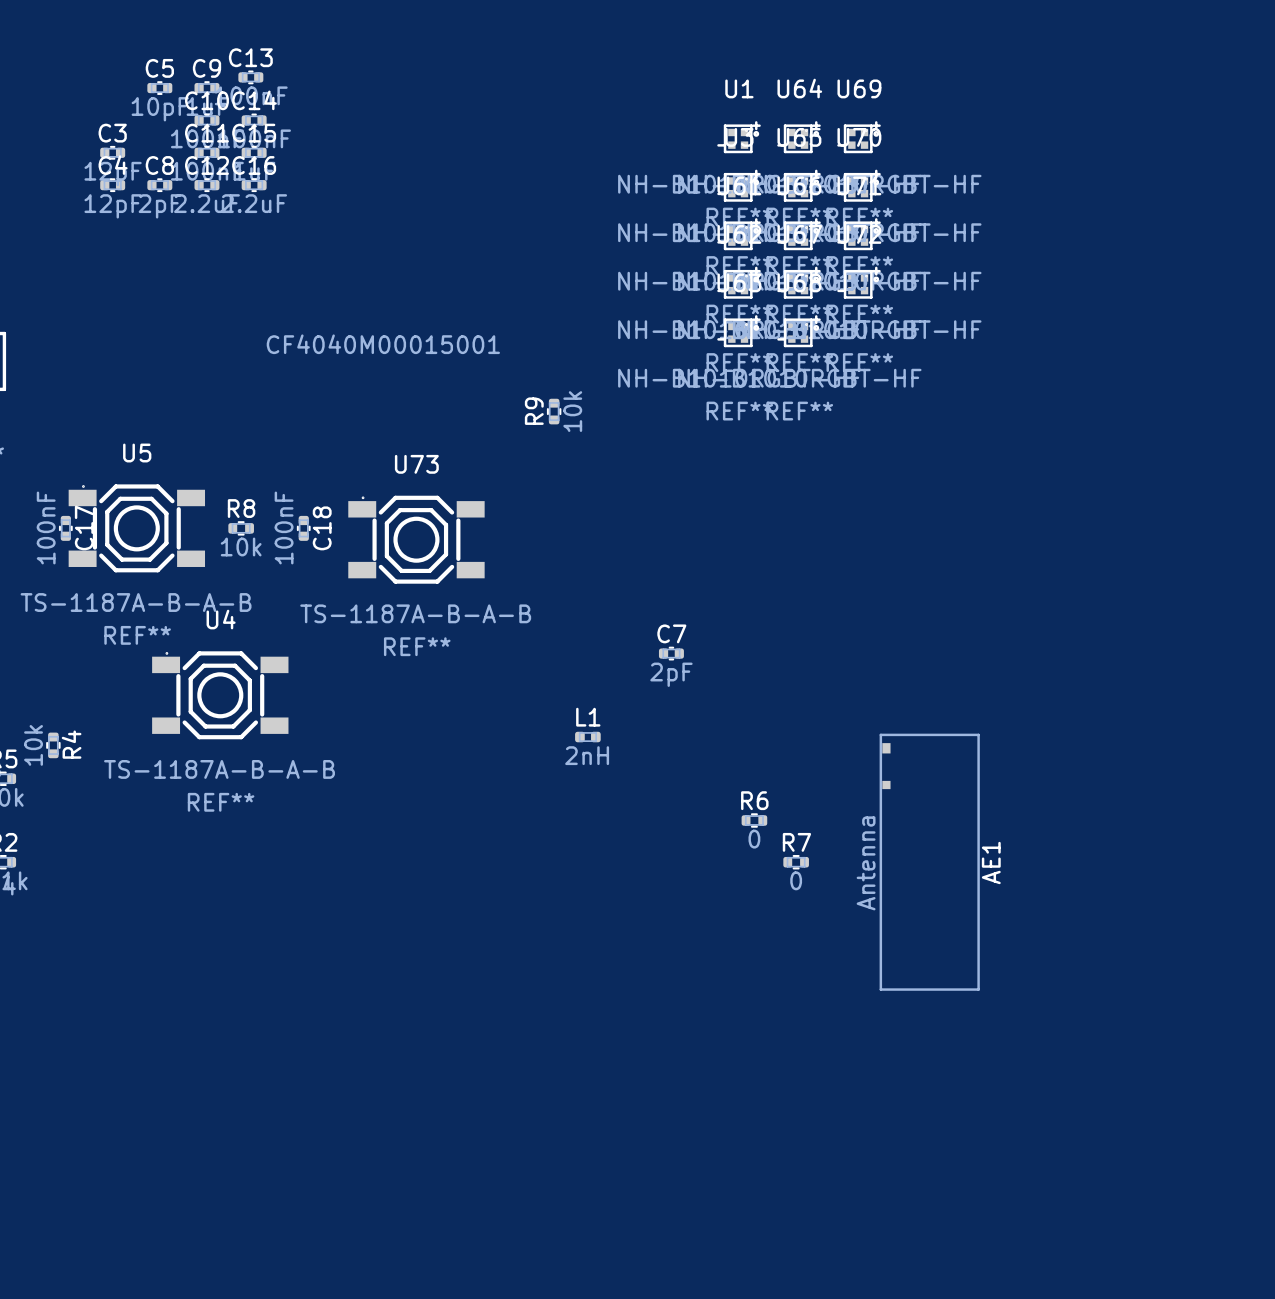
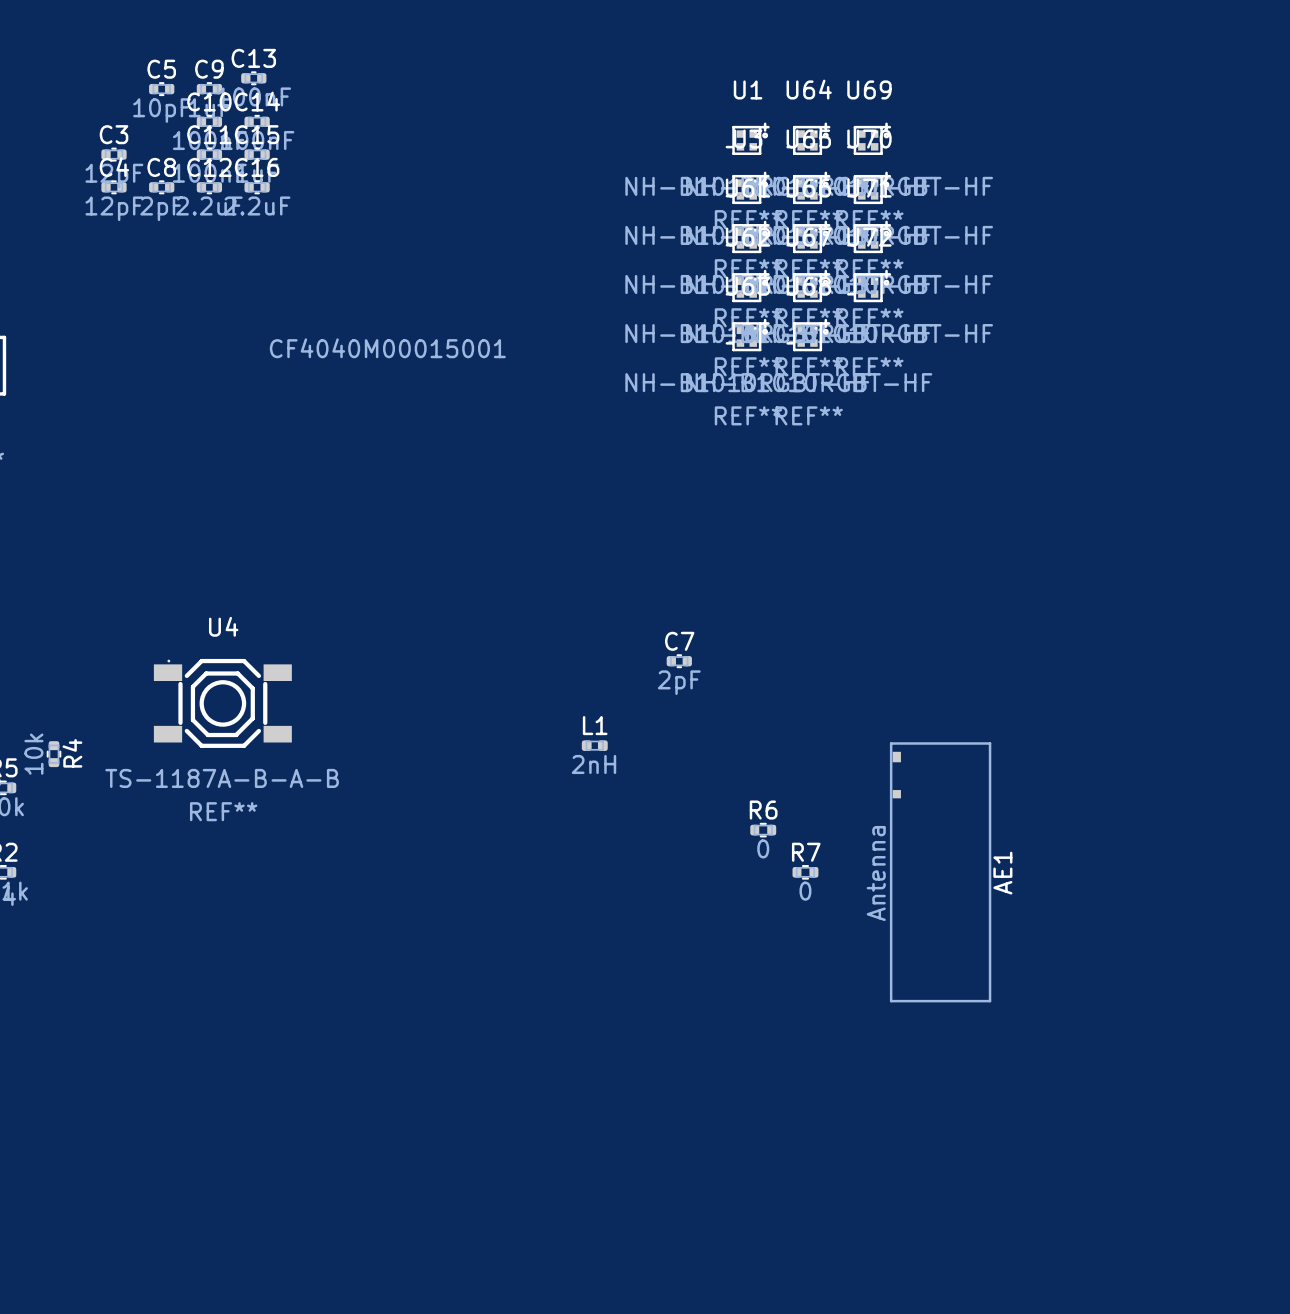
R9: 10k (554, 411) -> none
C17: 100nF (65, 528) -> none
U5: TS-1187A-B-A-B (136, 528) -> none
R8: 10k (241, 528) -> none
C18: 100nF (303, 528) -> none
U73: TS-1187A-B-A-B (416, 539) -> none

